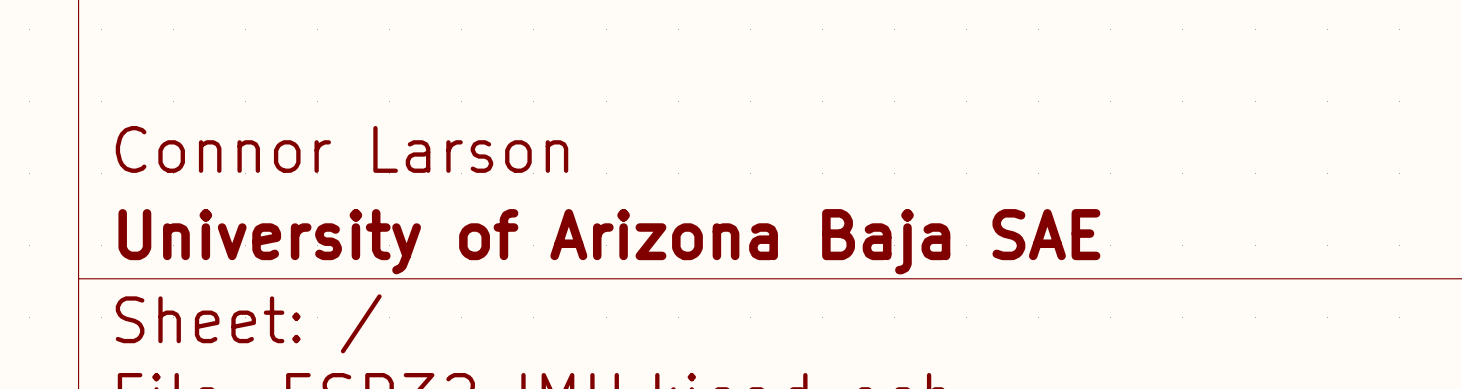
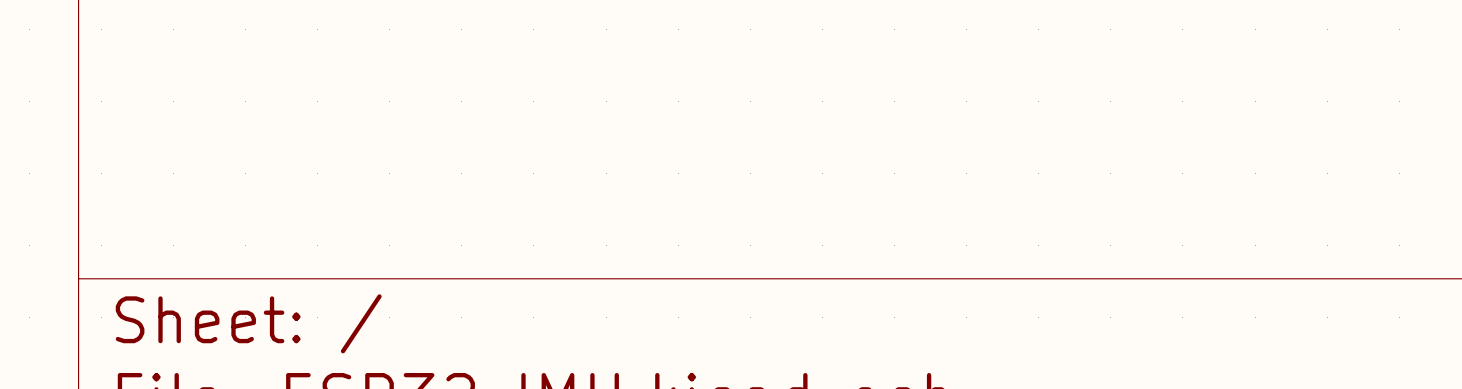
title block: Connor Larson (341, 149) -> none
title block: University of Arizona Baja SAE (609, 241) -> none

